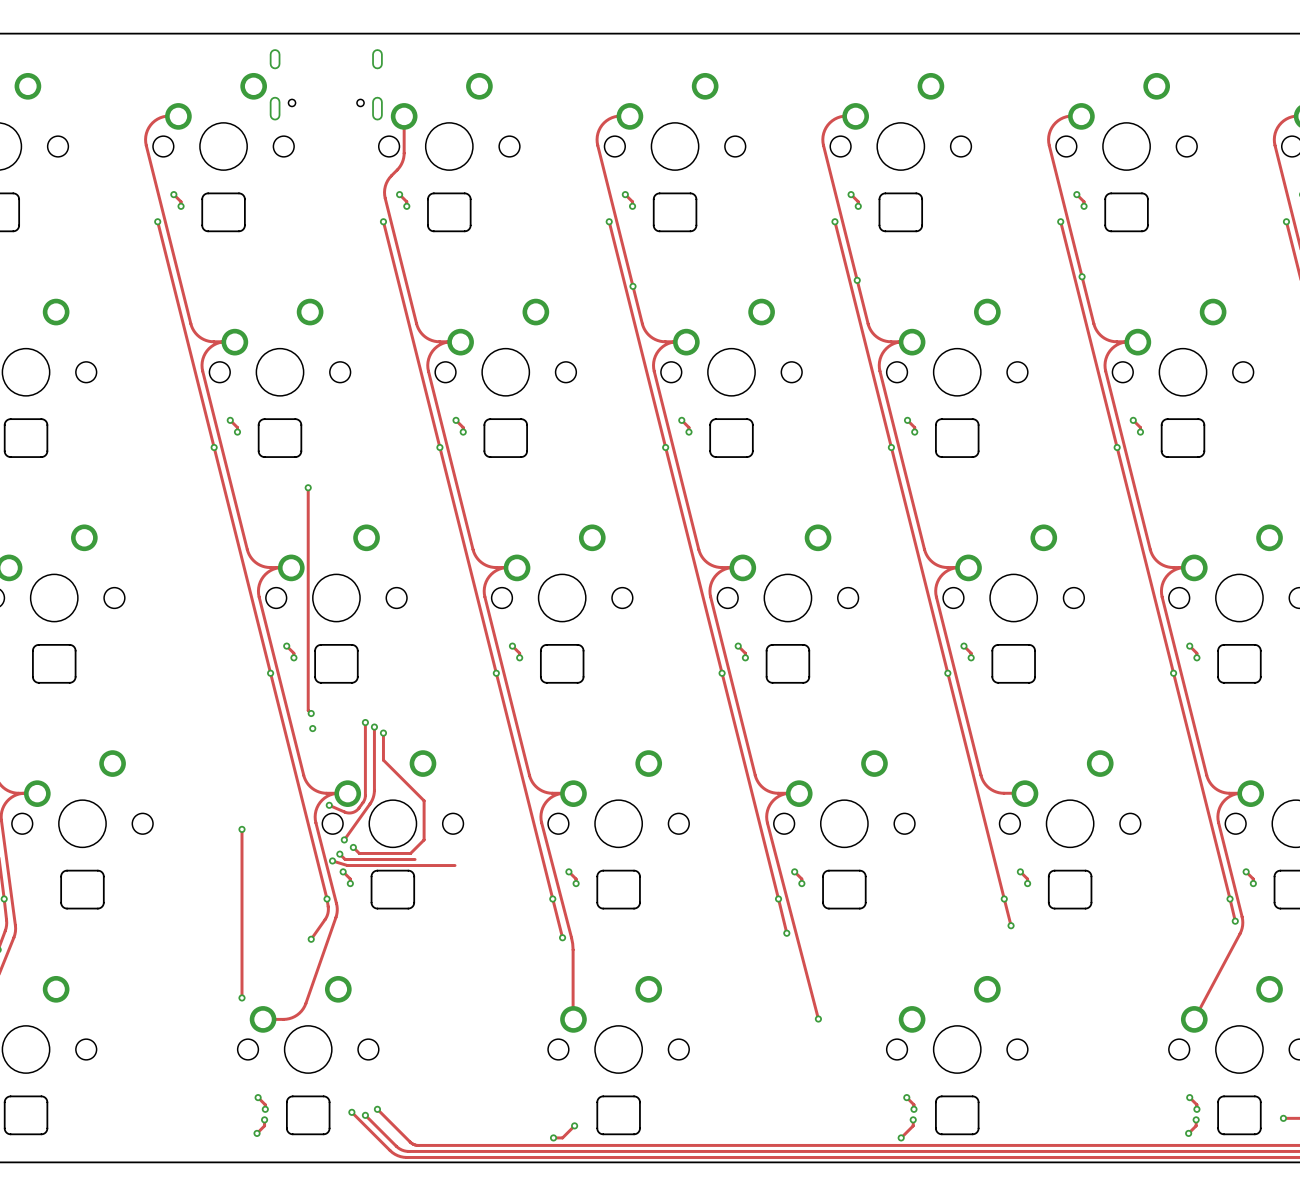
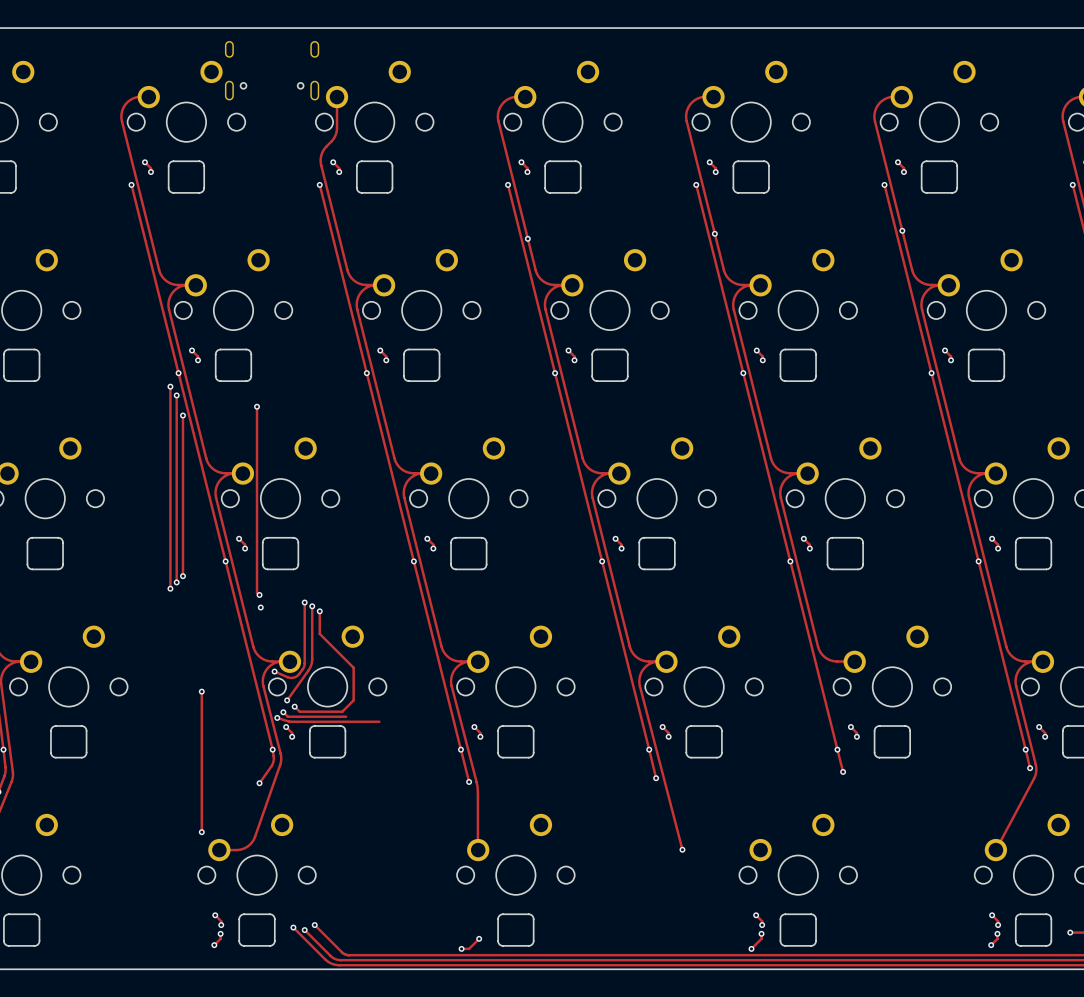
track: none -> (170, 386) (170, 588)
via: none -> (170, 386)
track: none -> (176, 395) (176, 582)
via: none -> (176, 395)
track: none -> (182, 415) (182, 576)
via: none -> (182, 415)
via: none -> (182, 576)
via: none -> (176, 582)
via: none -> (170, 588)

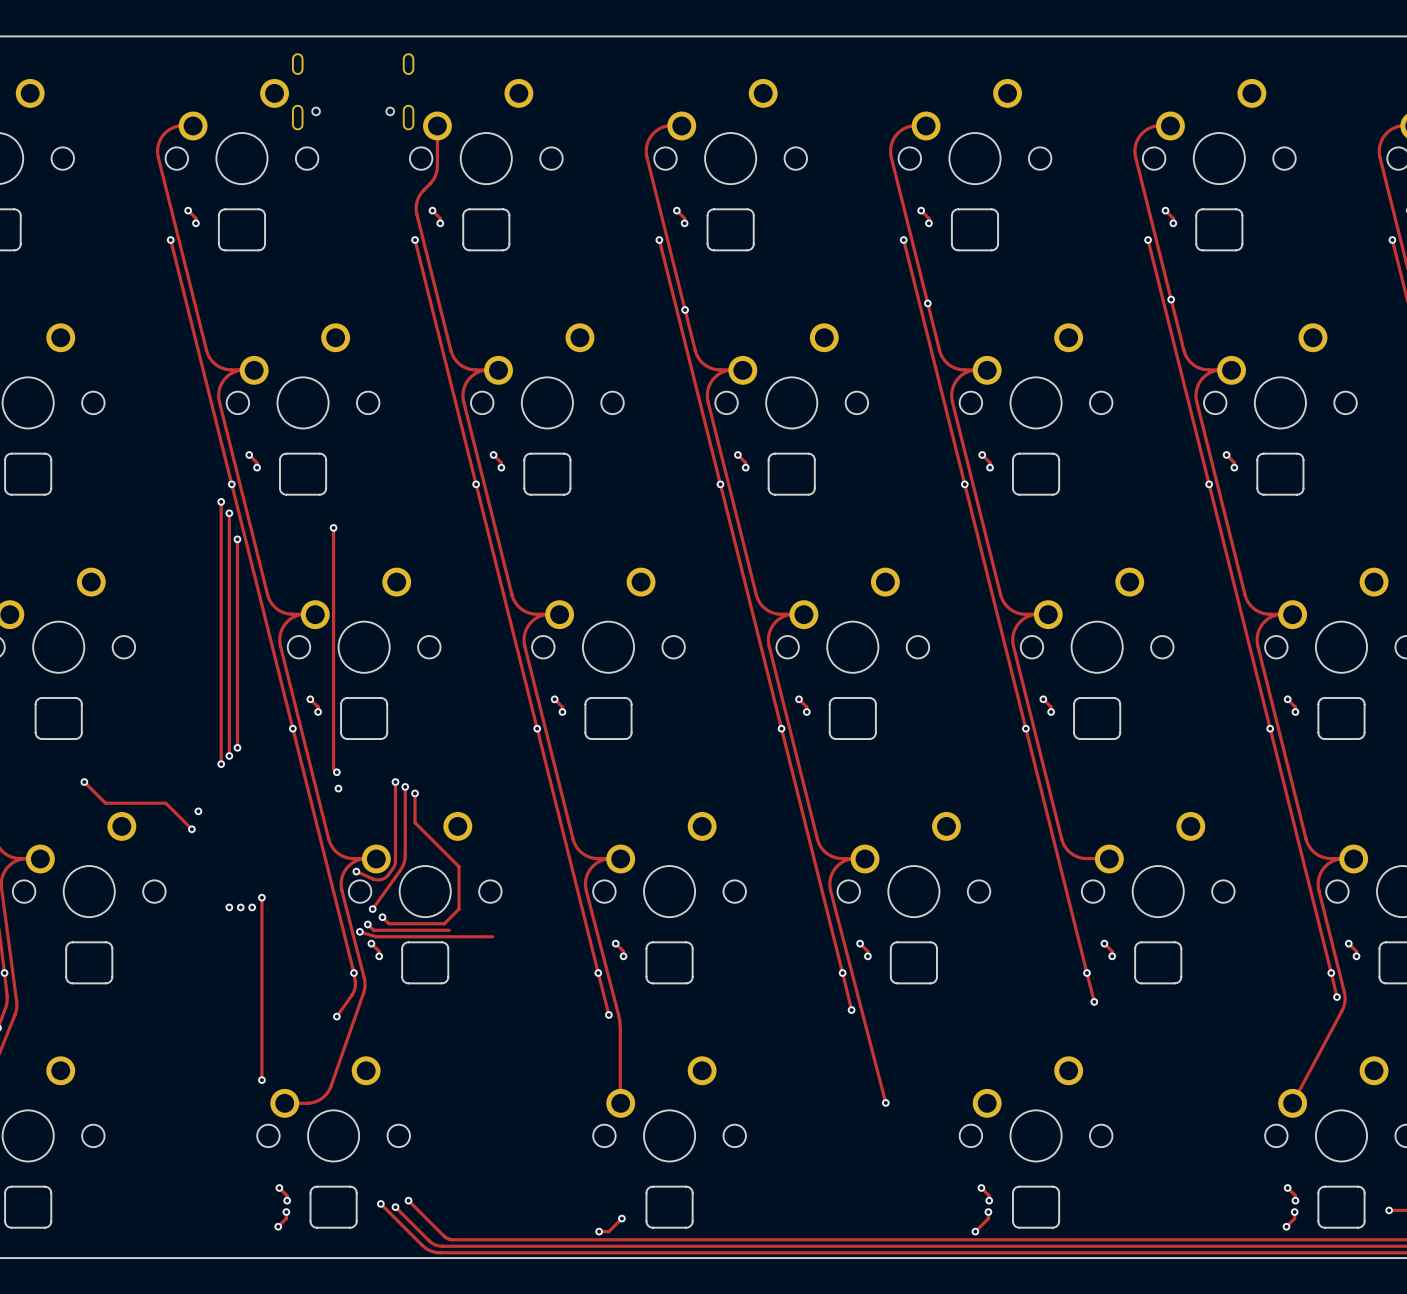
track: none -> (84, 782) (105, 803) (165, 803) (191, 829)
via: none -> (84, 782)
via: none -> (198, 811)
via: none -> (191, 829)
via: none -> (229, 907)
via: none -> (240, 907)
via: none -> (252, 907)

